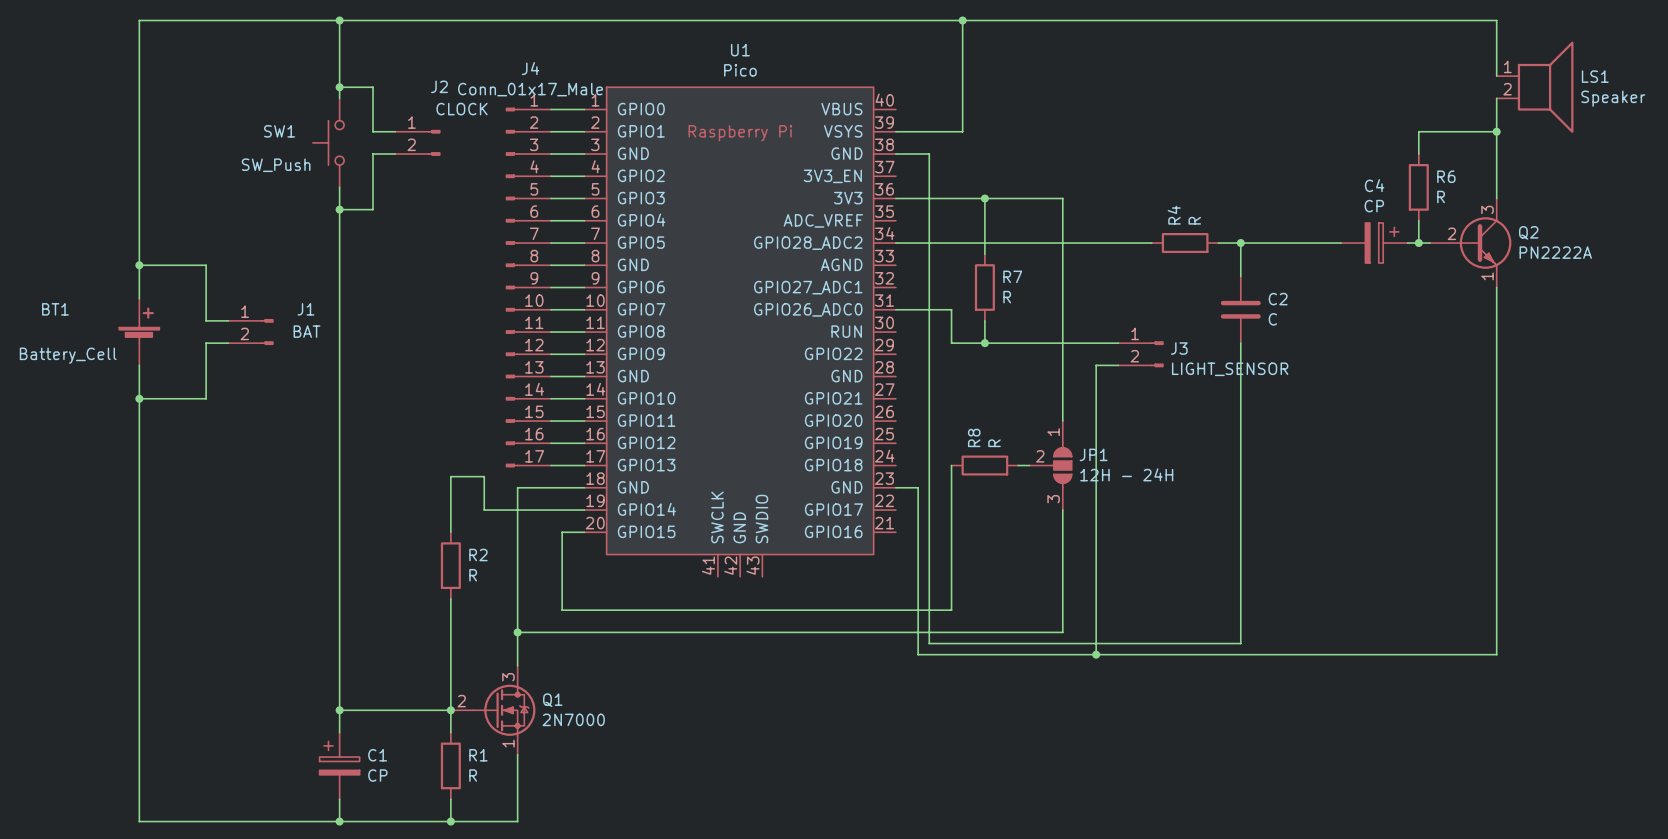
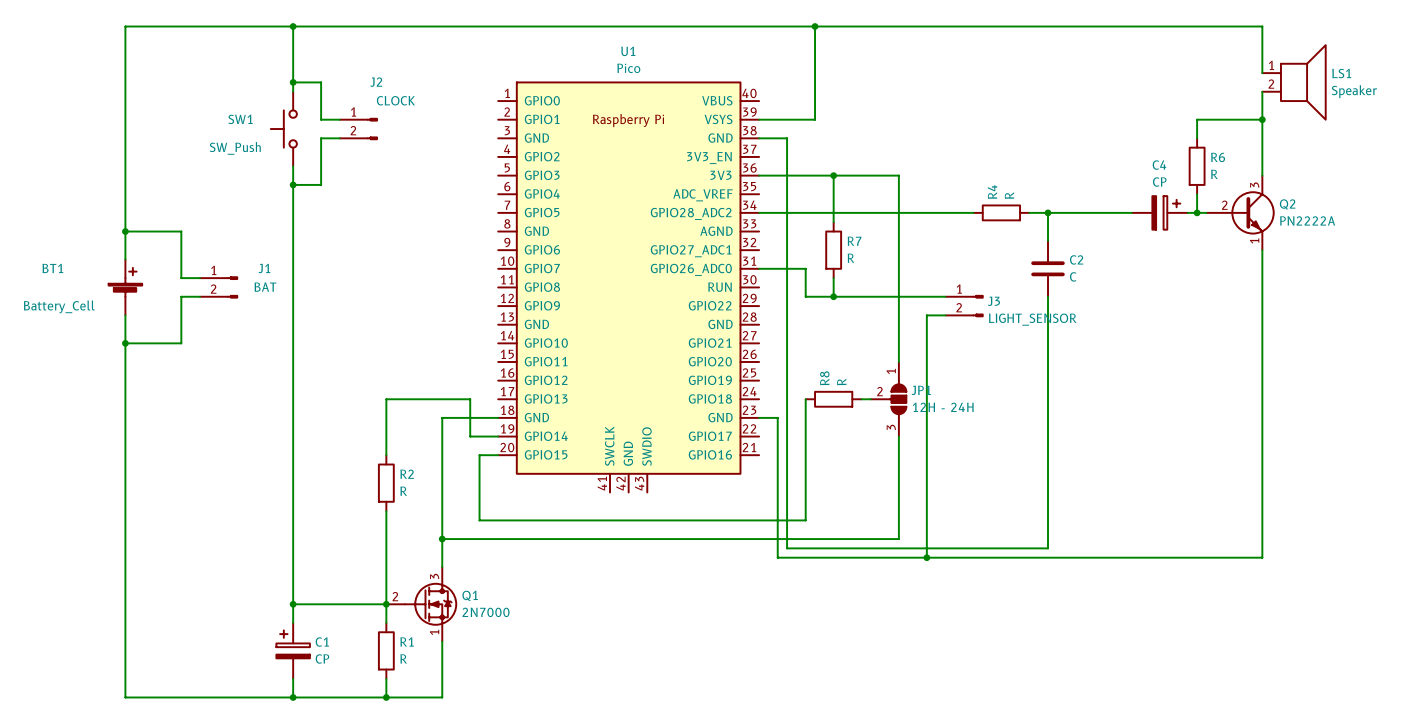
wire: (551, 109) (584, 109) -> none
wire: (551, 131) (584, 131) -> none
wire: (551, 154) (584, 154) -> none
wire: (551, 176) (584, 176) -> none
wire: (551, 198) (584, 198) -> none
wire: (551, 220) (584, 220) -> none
wire: (551, 243) (584, 243) -> none
wire: (551, 265) (584, 265) -> none
J4: Conn_01x17_Male (528, 287) -> none
wire: (551, 287) (584, 287) -> none
wire: (551, 309) (584, 309) -> none
wire: (551, 332) (584, 332) -> none
wire: (551, 354) (584, 354) -> none
wire: (551, 376) (584, 376) -> none
wire: (551, 398) (584, 398) -> none
wire: (551, 421) (584, 421) -> none
wire: (551, 443) (584, 443) -> none
wire: (551, 465) (584, 465) -> none
wire: (450, 476) (484, 476) (484, 510) (551, 510) -> (386, 408) (386, 399) (470, 399) (470, 436)

